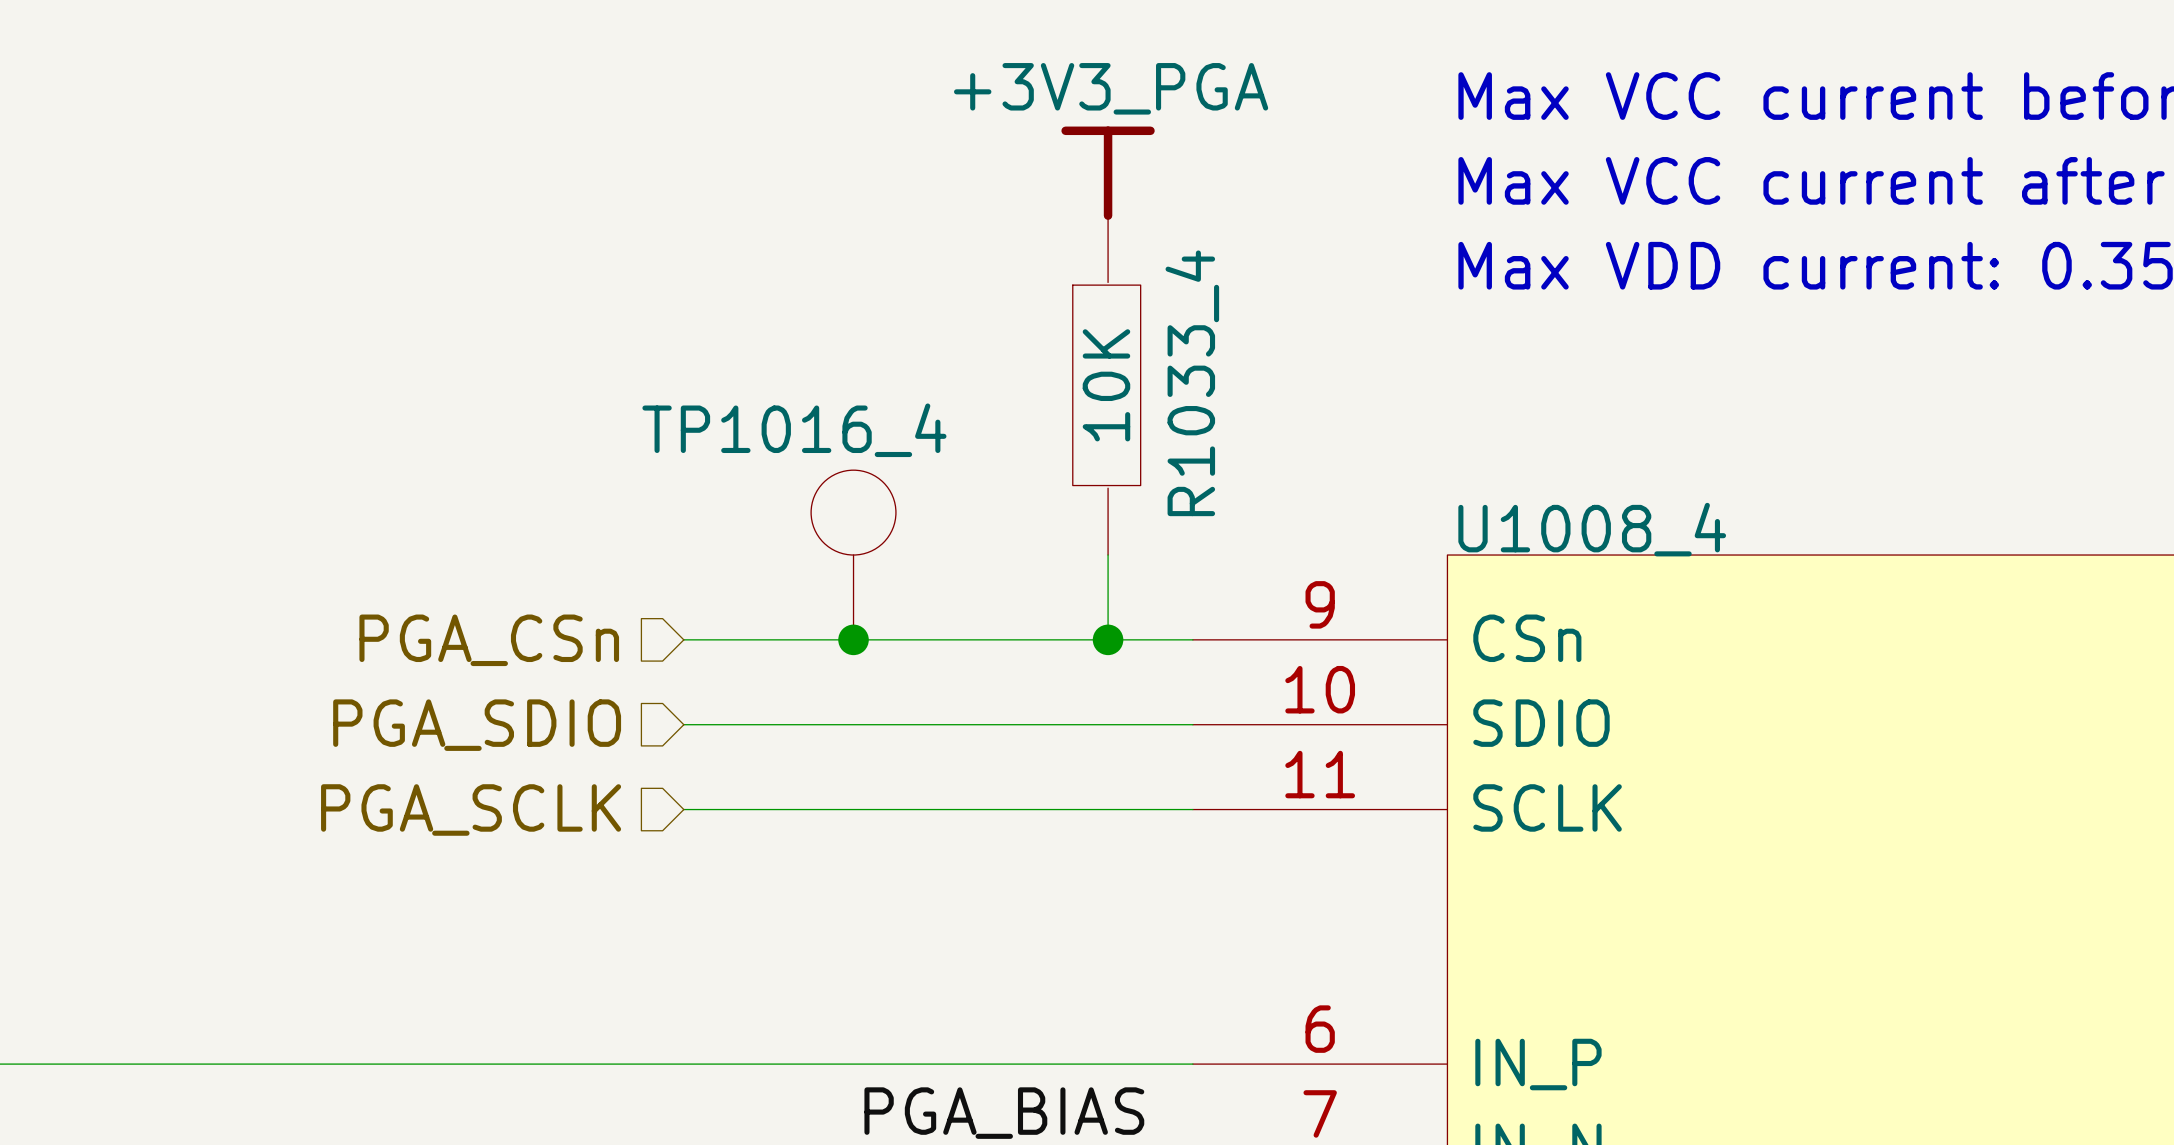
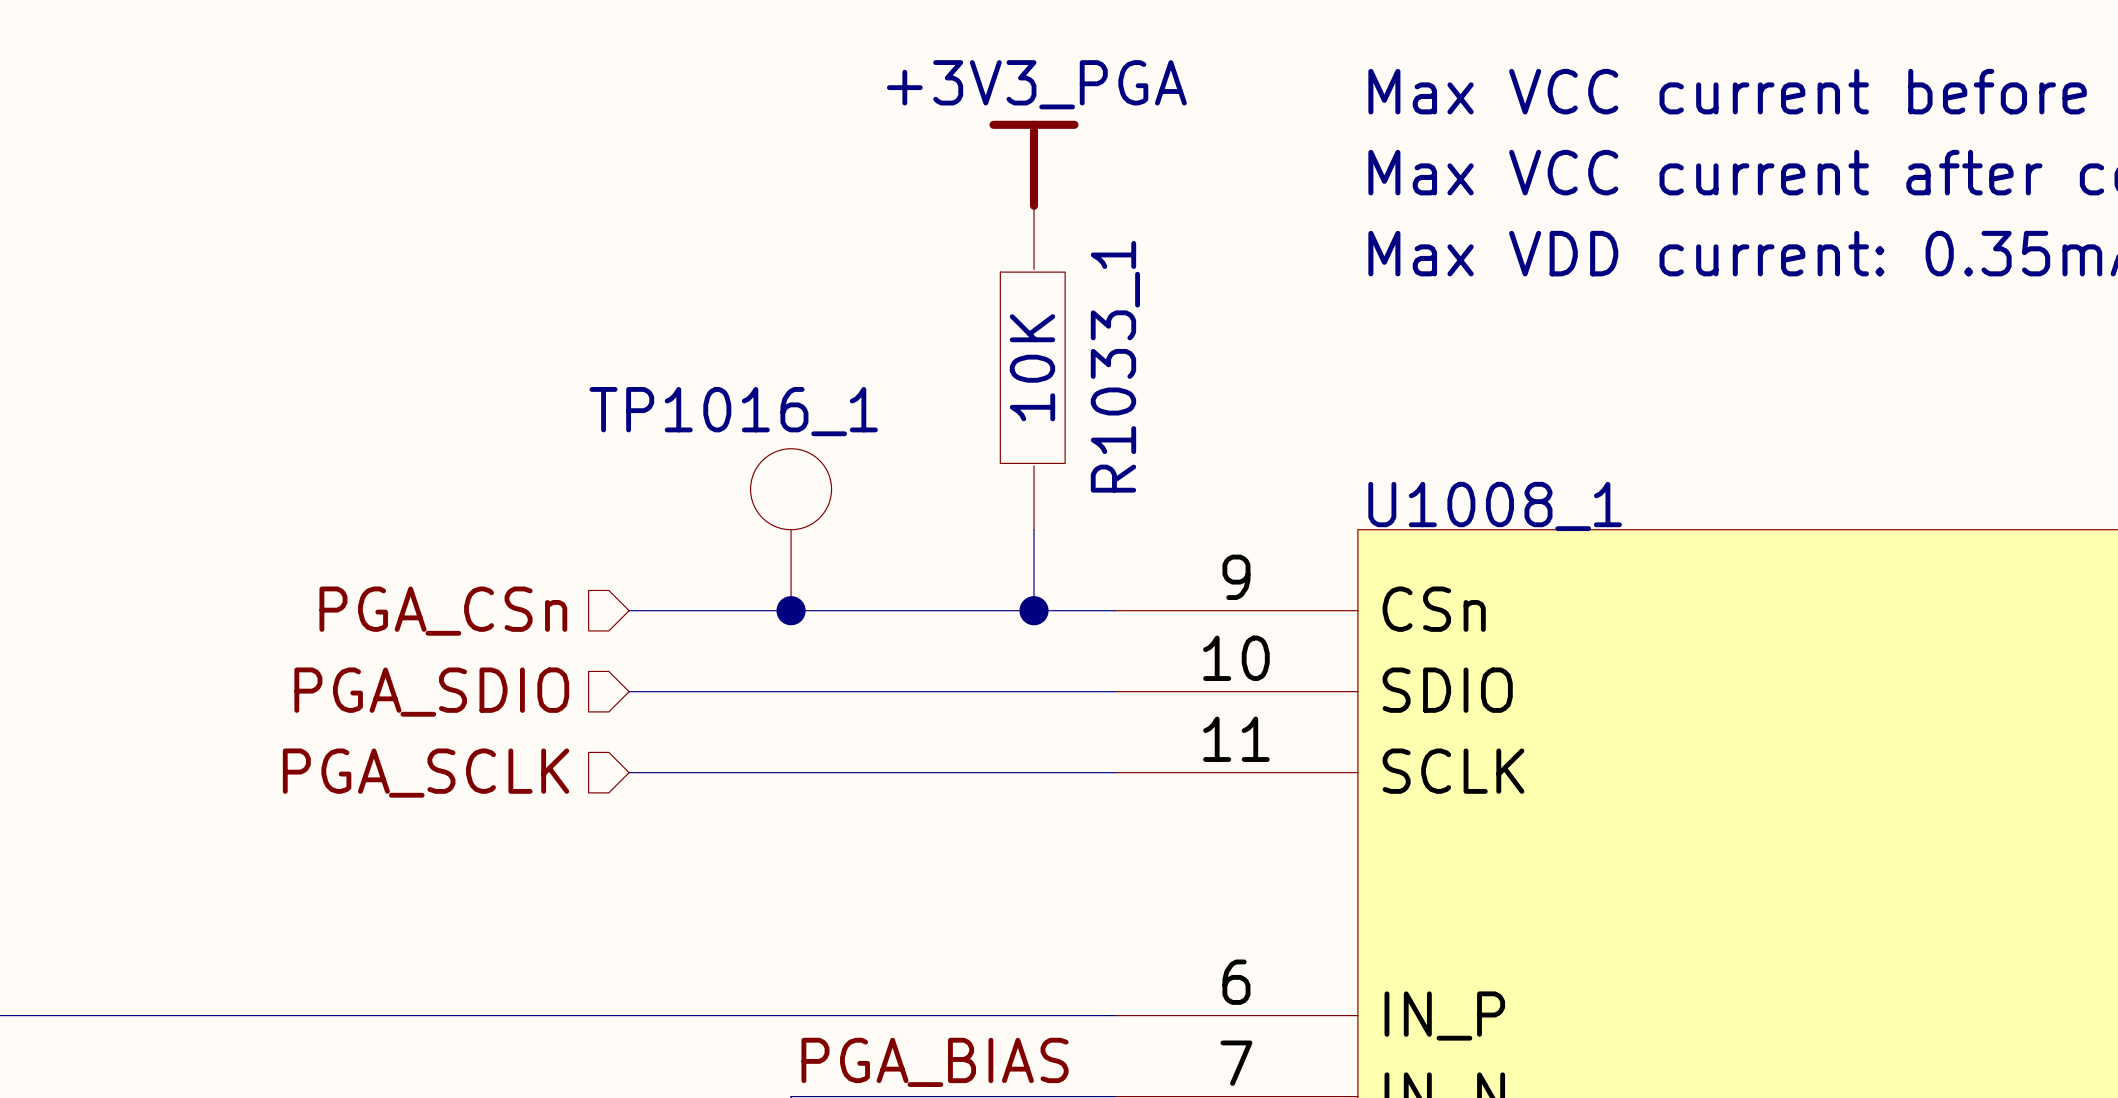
R1033_4 name: R1033_4 (1192, 383) -> R1033_1 (1115, 366)
TP1016_4 name: TP1016_4 (794, 430) -> TP1016_1 (733, 411)
U1008_4 name: U1008_4 (1592, 529) -> U1008_1 (1495, 506)

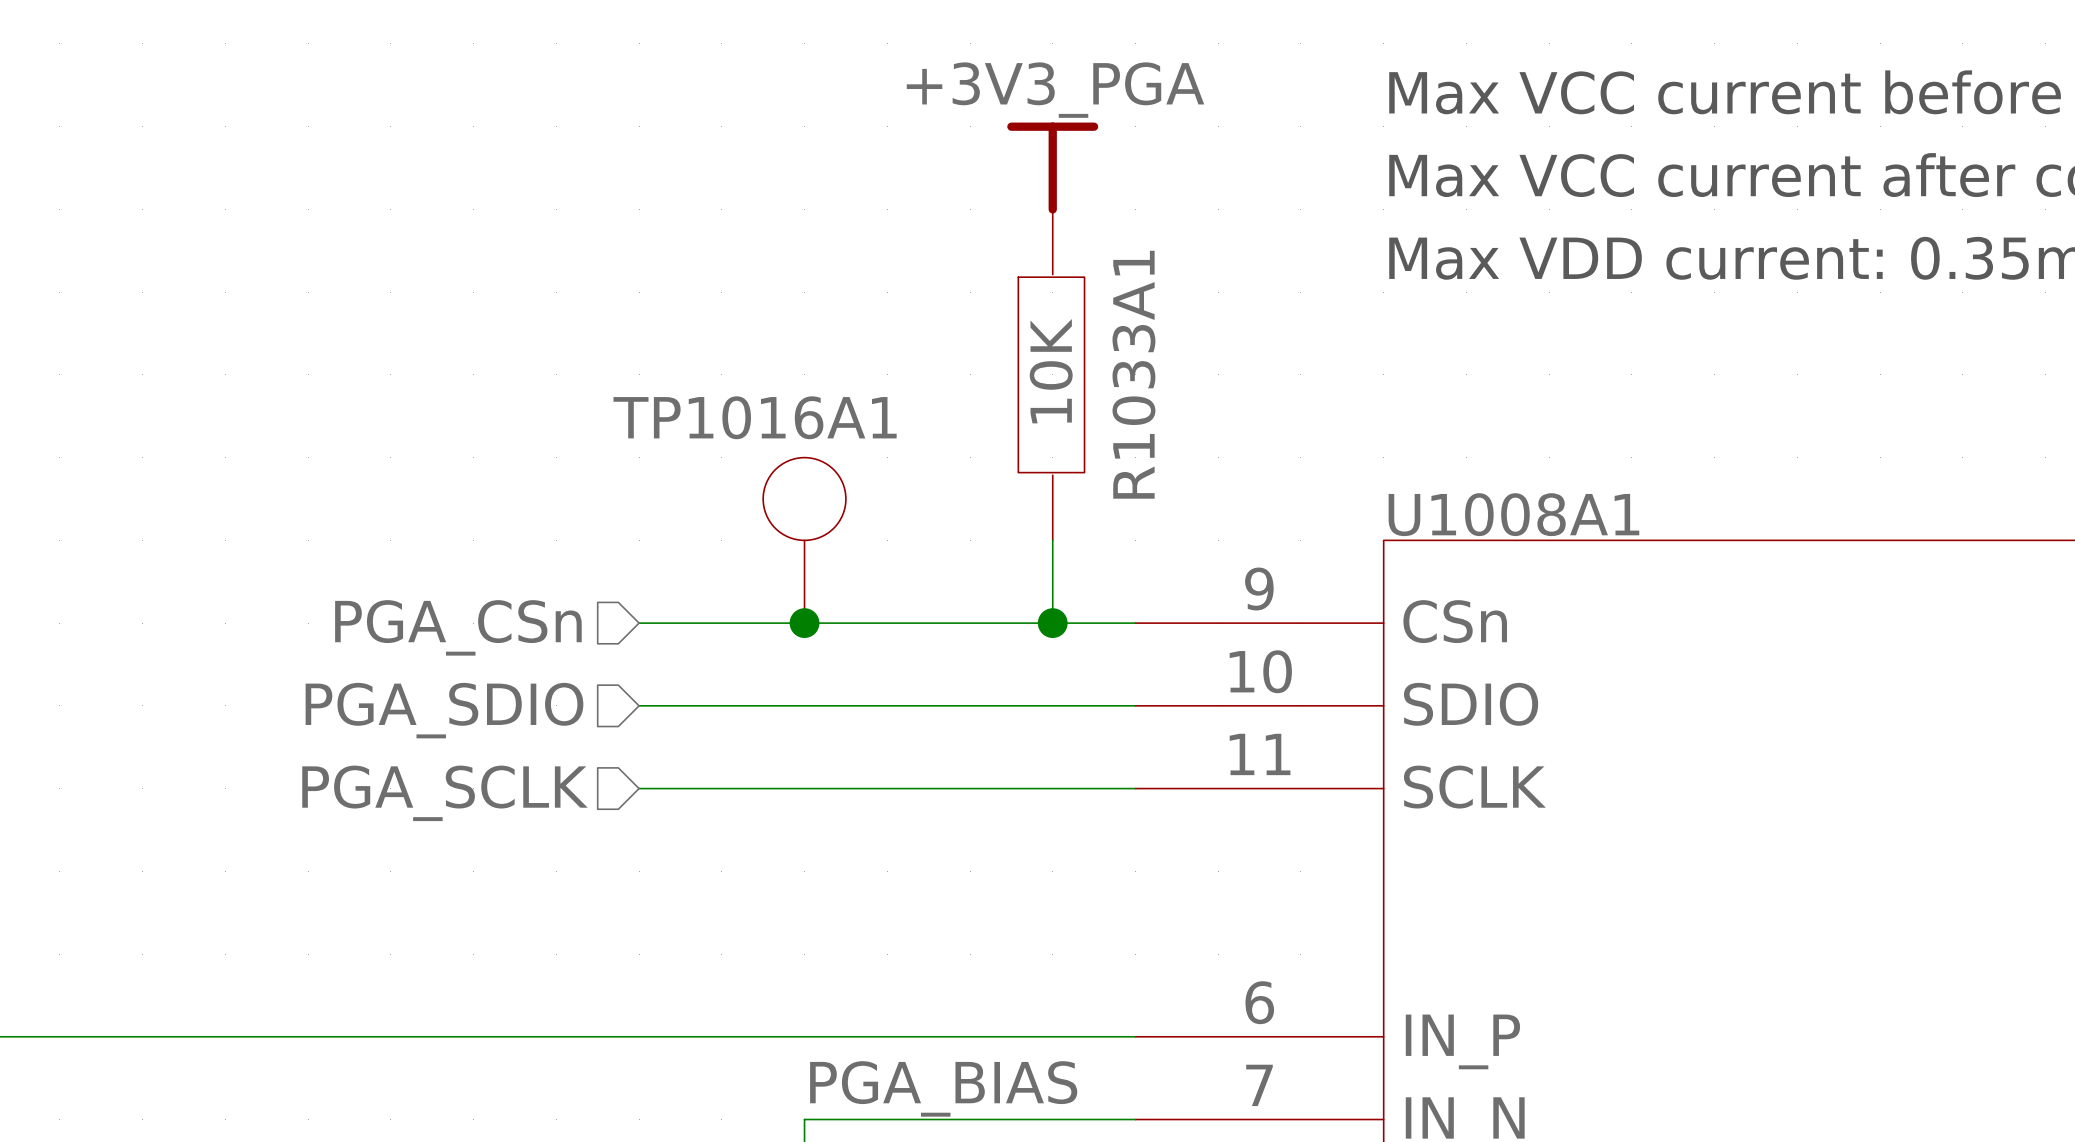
R1033_1 name: R1033_1 (1115, 366) -> R1033A1 (1133, 374)
TP1016_1 name: TP1016_1 (733, 411) -> TP1016A1 (755, 417)
U1008_1 name: U1008_1 (1495, 506) -> U1008A1 (1513, 514)

